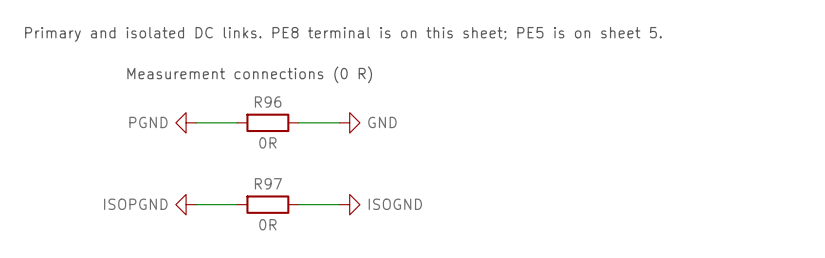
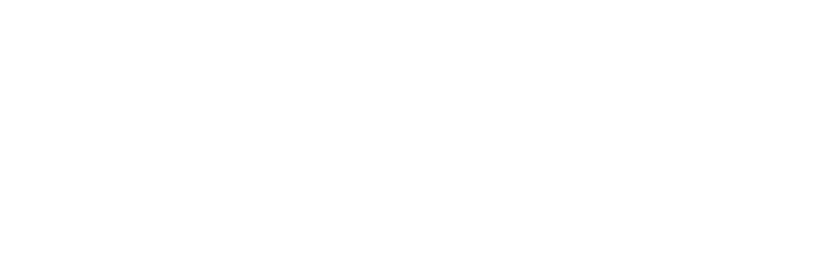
text: Primary and isolated DC links. PE8 terminal is on this sheet; PE5 is on sheet 5. (343, 34) -> none
text: Measurement connections (0 R) (249, 74) -> none
power symbol: PGND (186, 122) -> none
wire: (196, 122) (237, 122) -> none
R96: 0R (267, 122) -> none
wire: (298, 122) (339, 122) -> none
power symbol: GND (349, 122) -> none
power symbol: ISOPGND (186, 204) -> none
wire: (196, 204) (237, 204) -> none
R97: 0R (267, 204) -> none
wire: (298, 204) (339, 204) -> none
power symbol: ISOGND (349, 204) -> none

